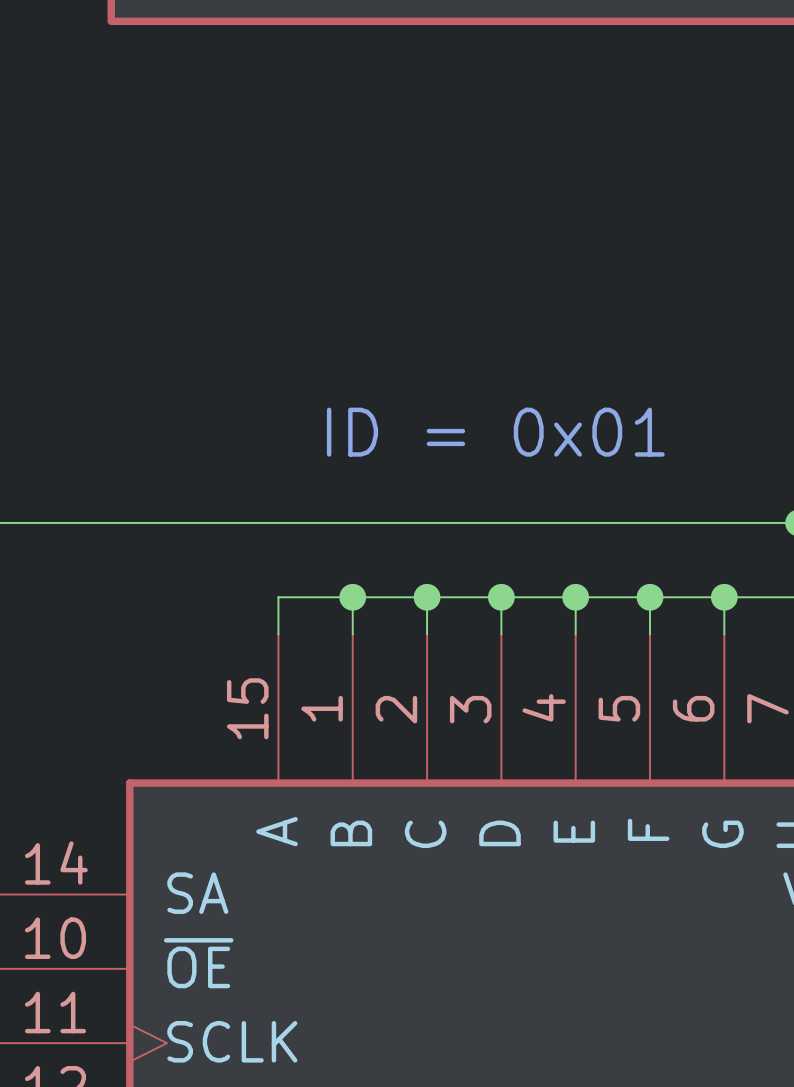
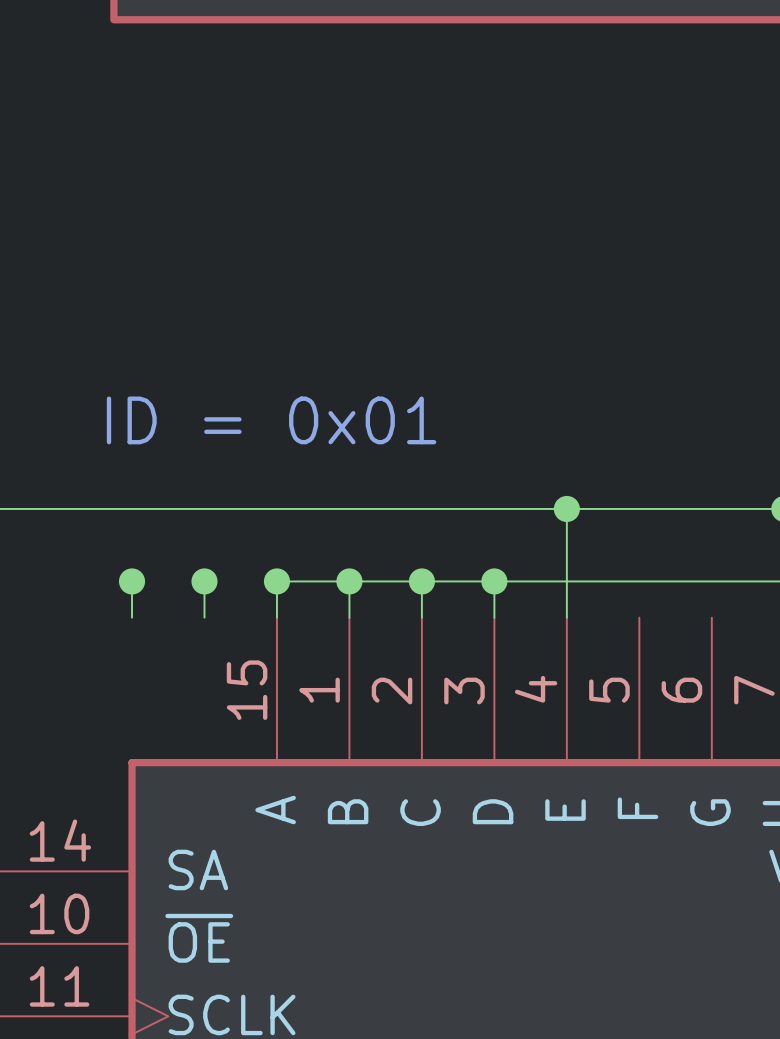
text position: ID = 0x01 (495, 432) -> ID = 0x01 (271, 420)
wire: none -> (566, 508) (566, 581)
junction: none -> (566, 508)
junction: none -> (132, 581)
junction: none -> (204, 581)
junction: none -> (276, 581)
junction: (575, 597) -> none
wire: (650, 597) (650, 634) -> (132, 581) (132, 617)
junction: (650, 597) -> none
wire: (724, 597) (724, 634) -> (204, 581) (204, 617)
junction: (724, 597) -> none

